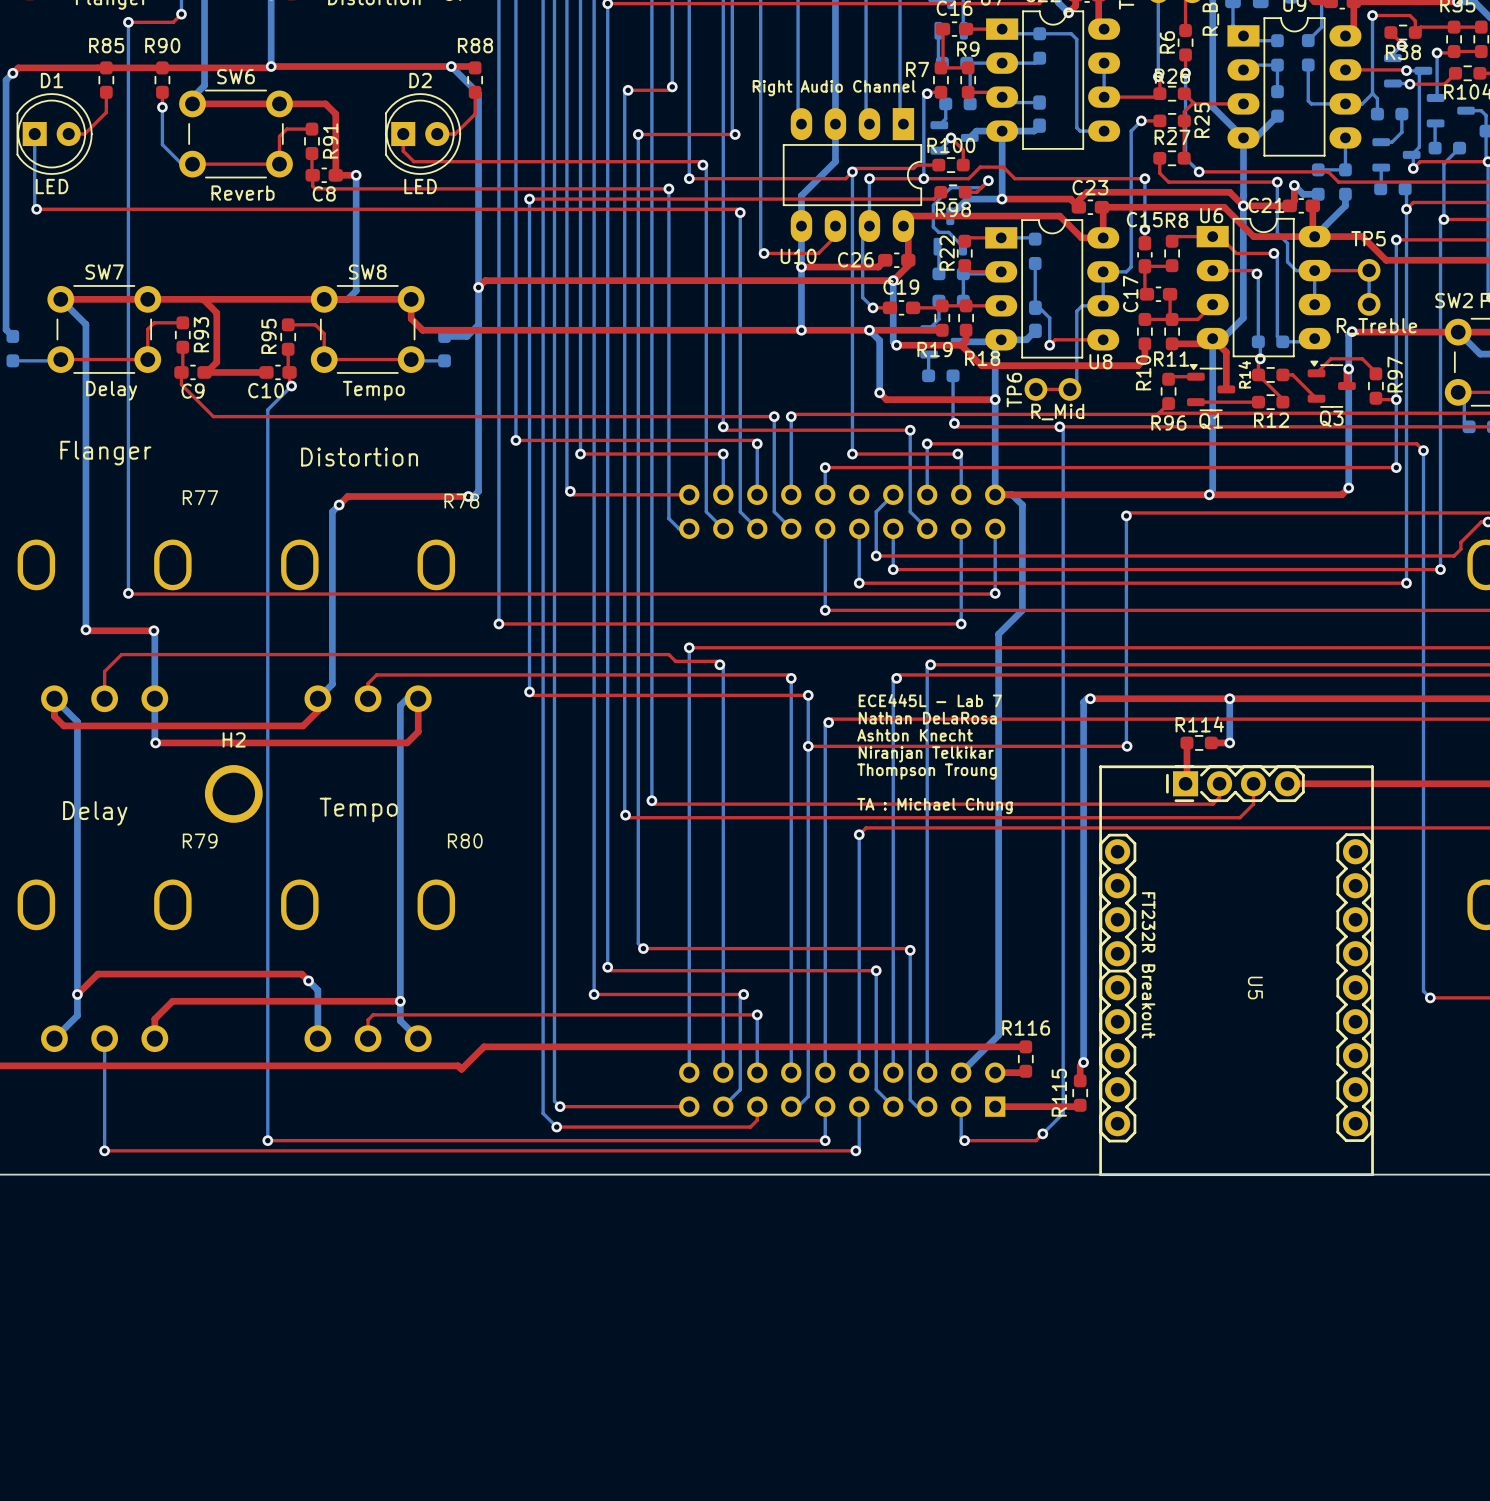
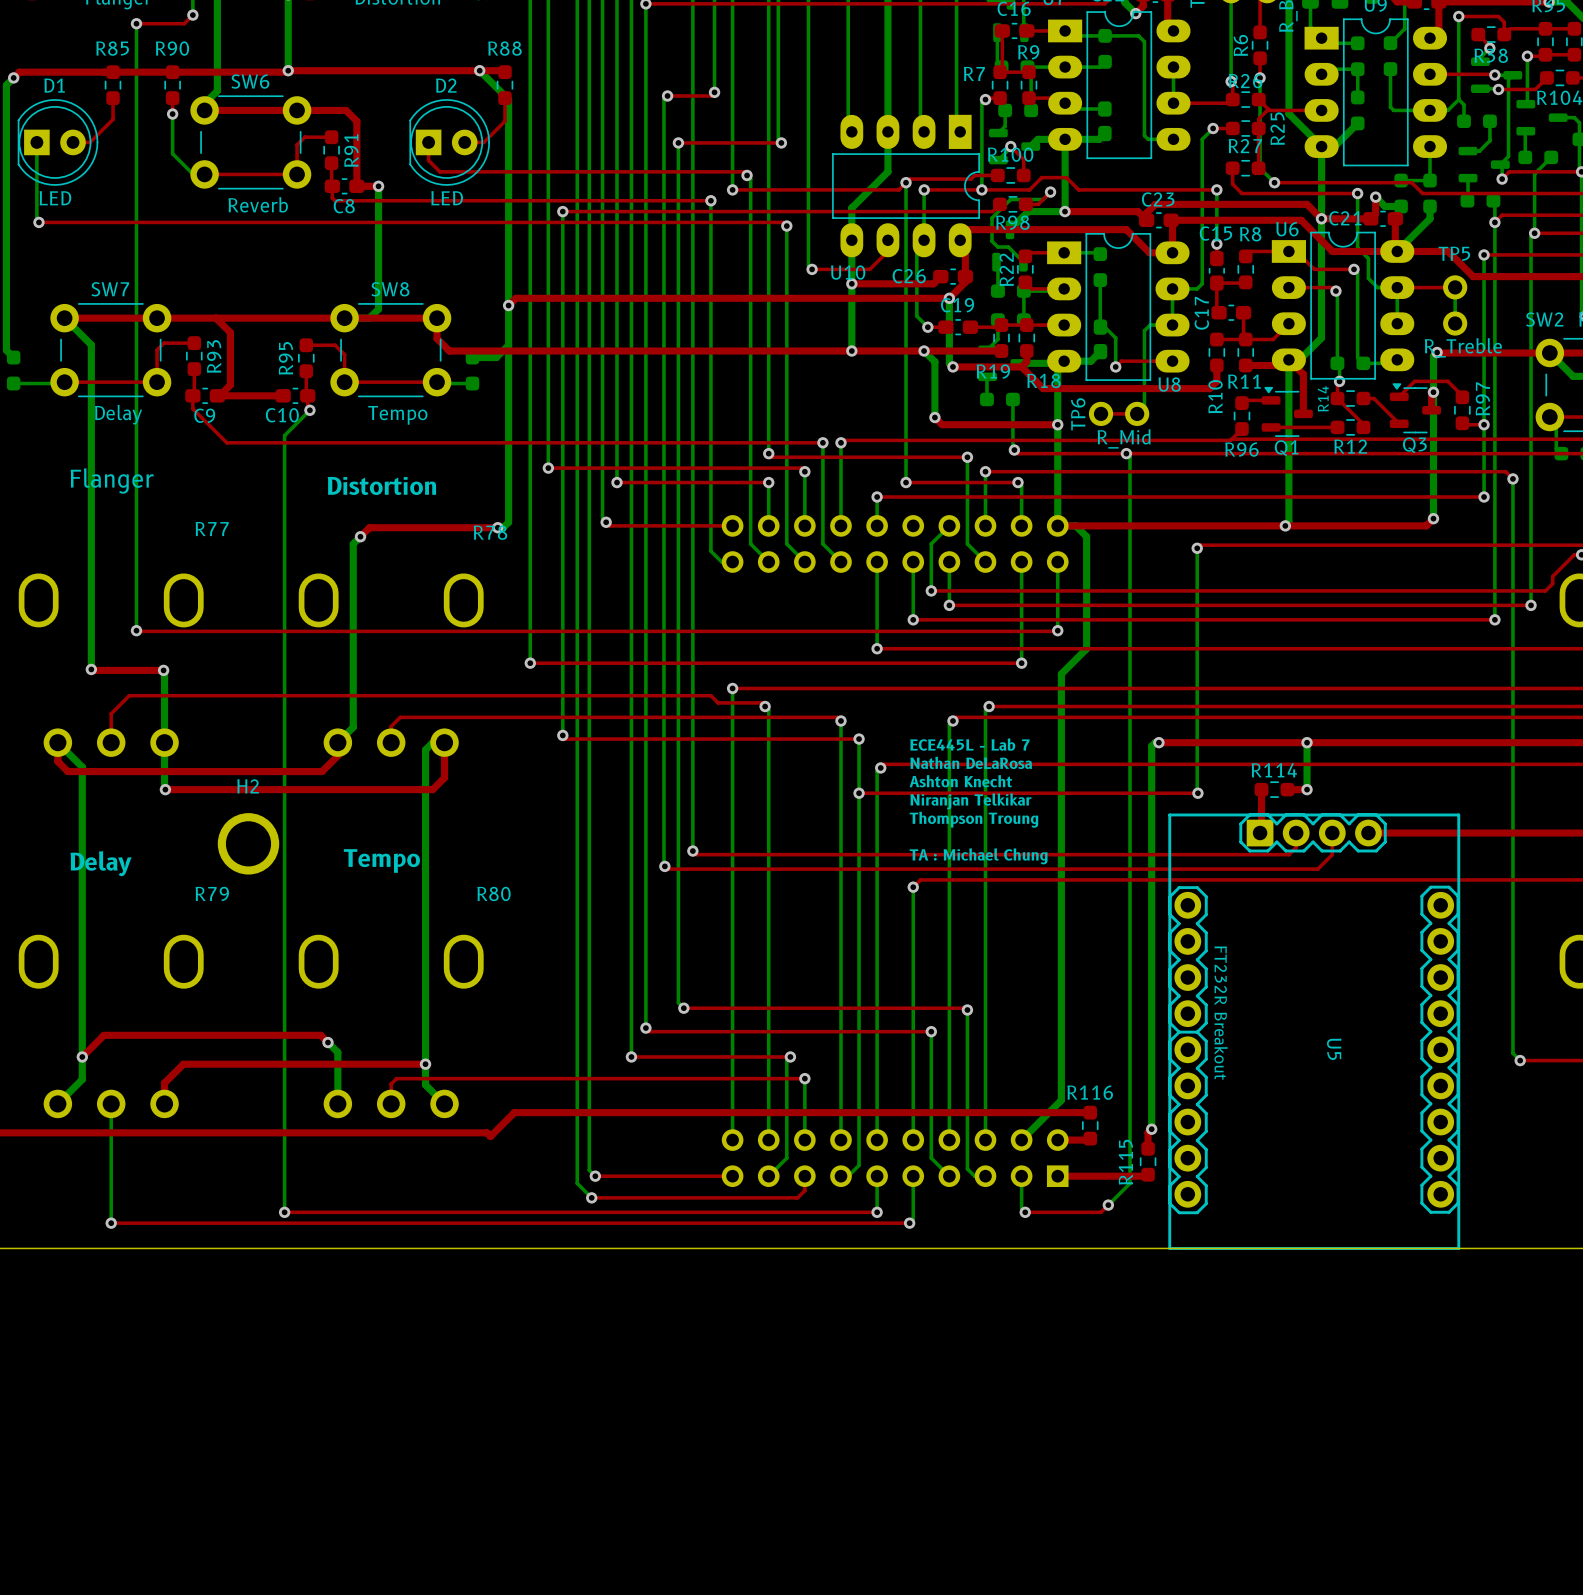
text: Right Audio Channel (834, 88) -> none
U5 footprint: [1099, 765, 1374, 1177] -> [1168, 813, 1461, 1250]

